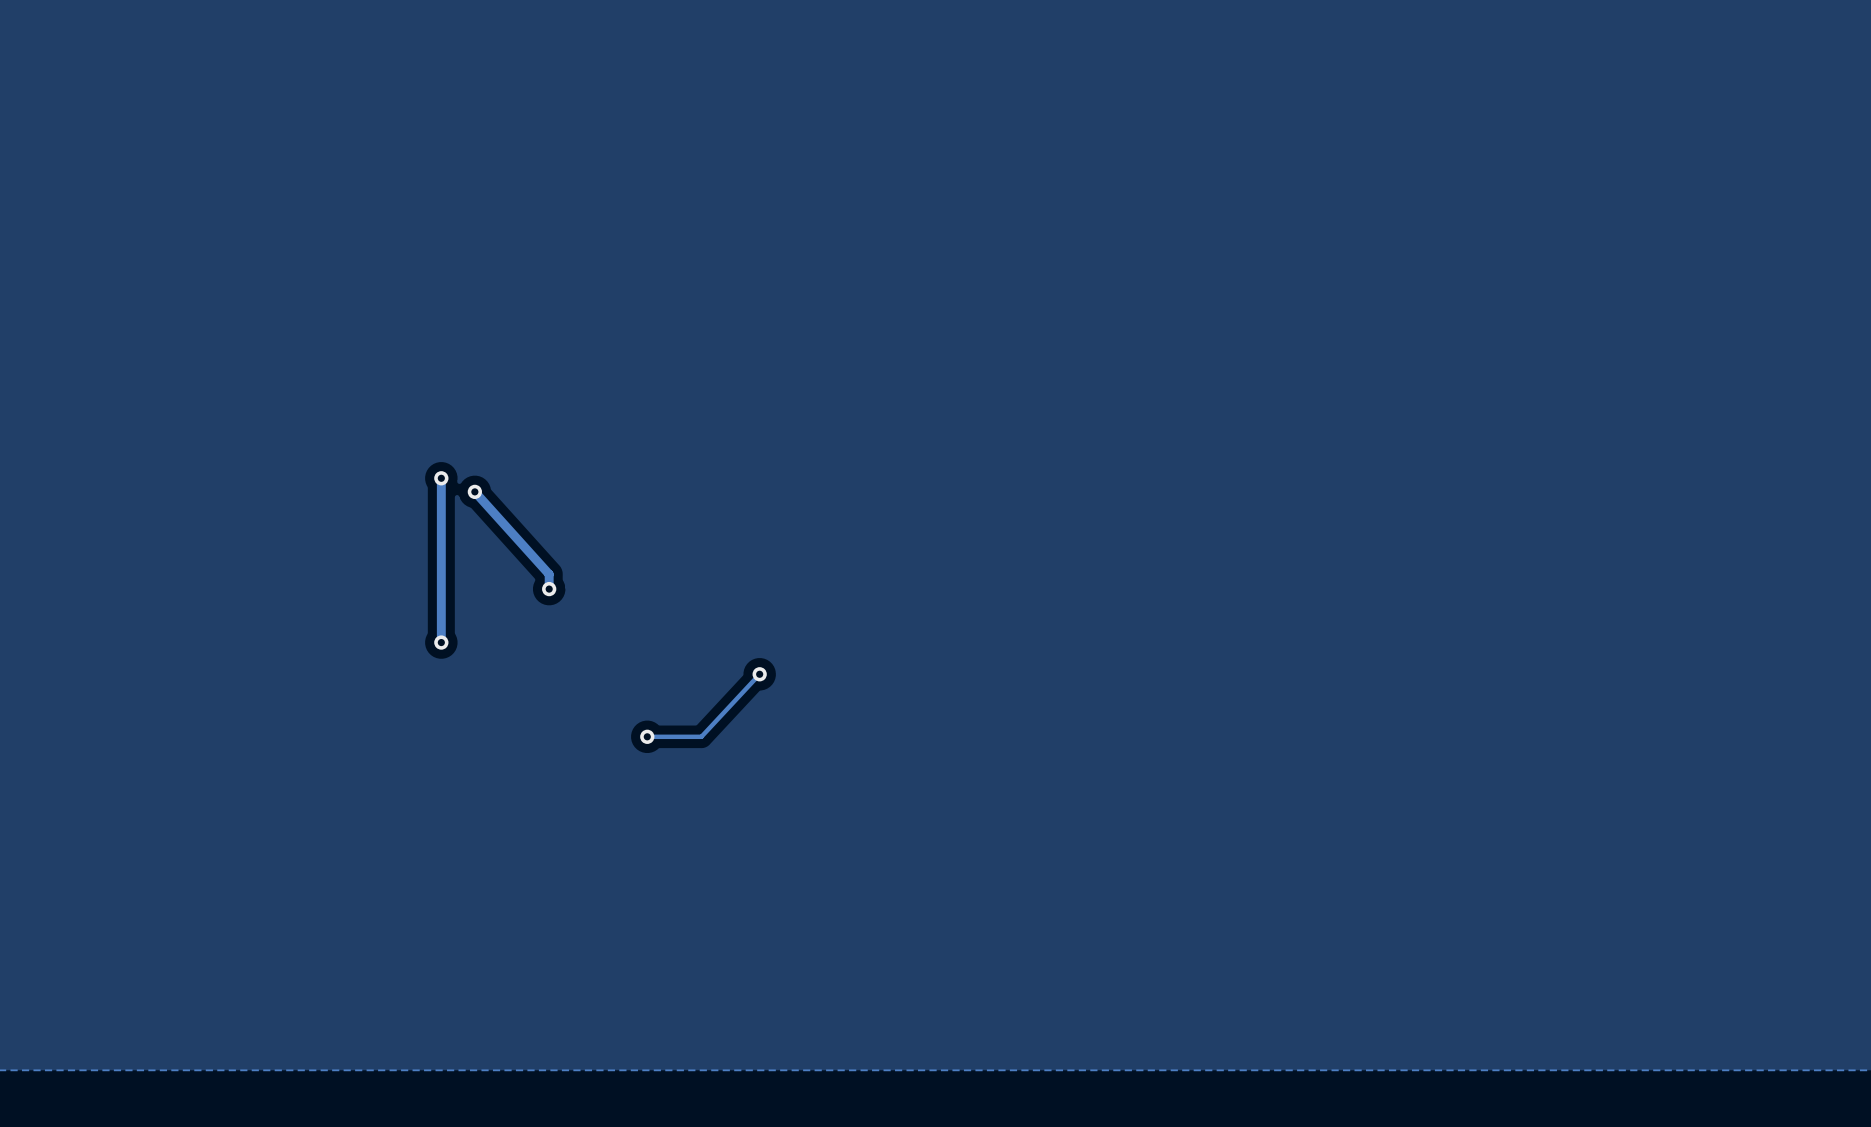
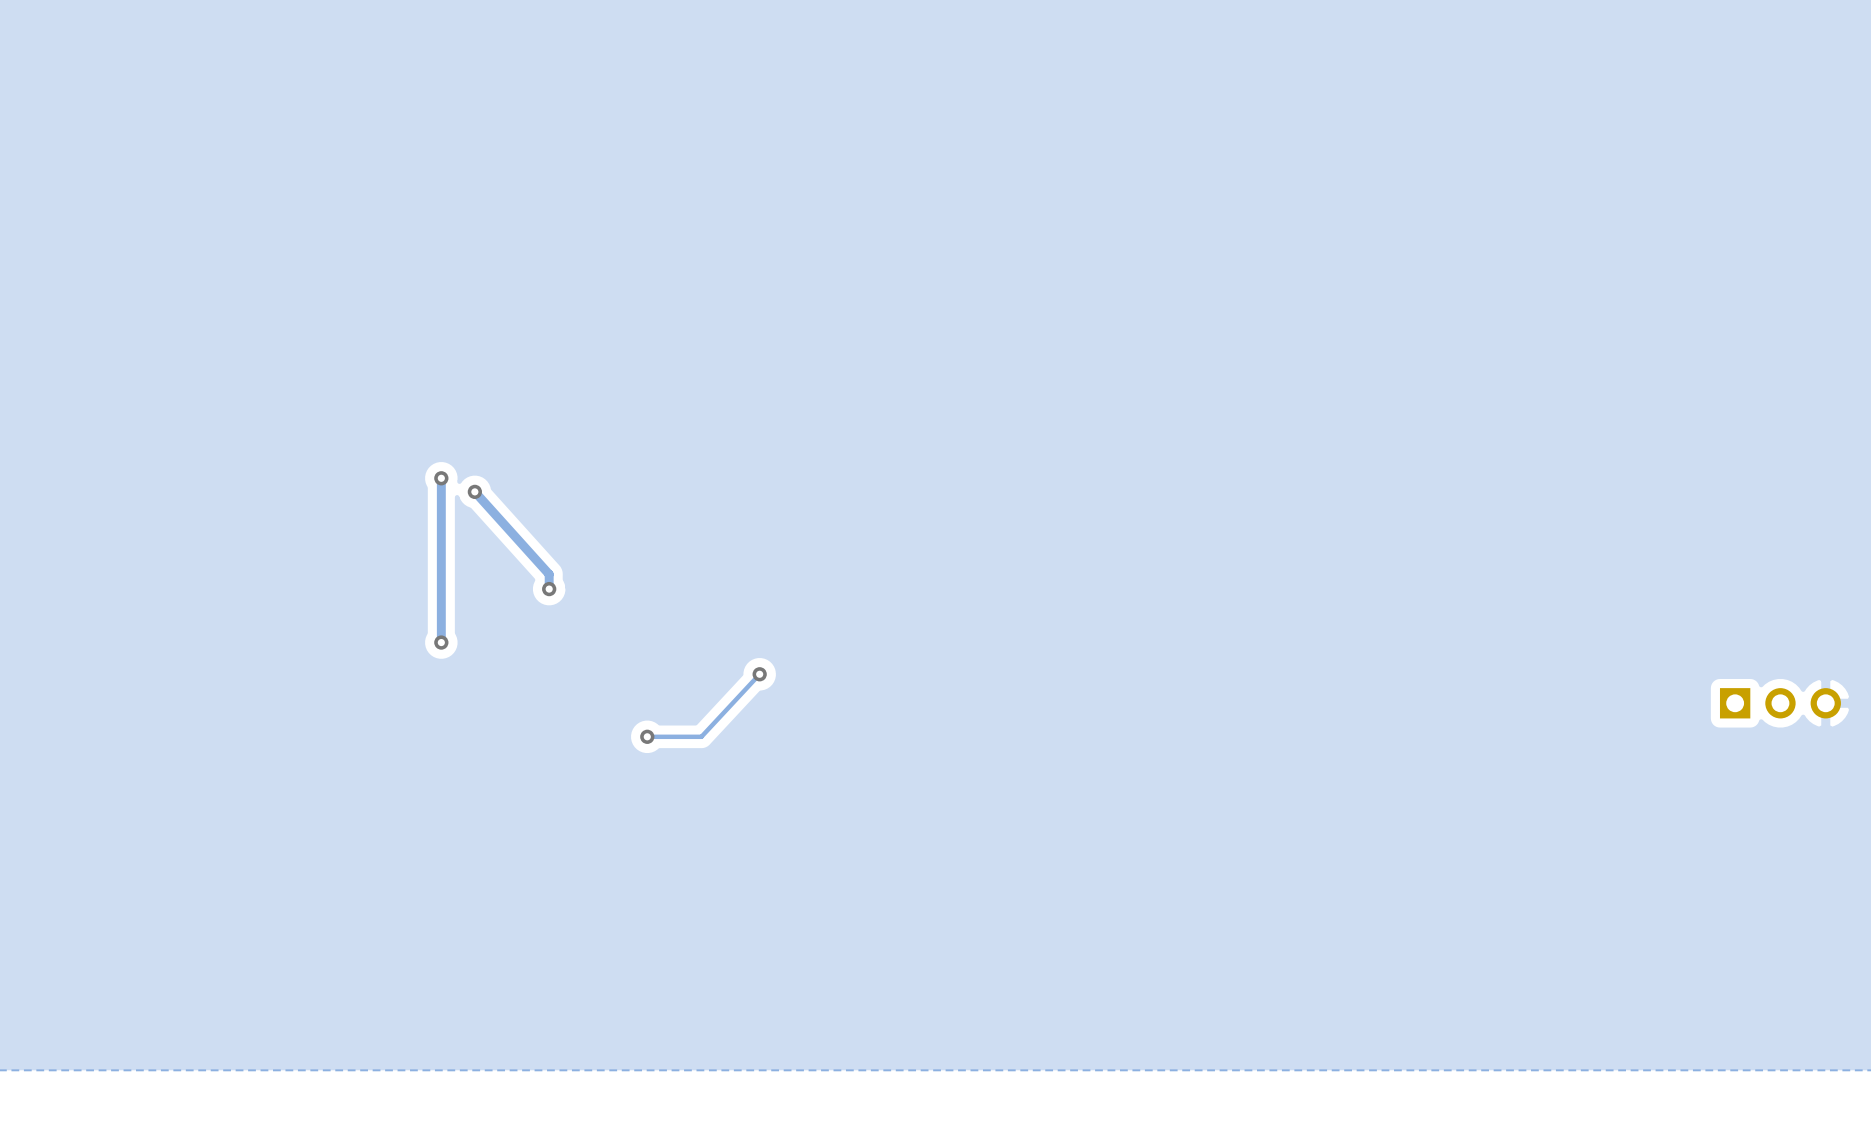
part: none -> (1780, 703)

